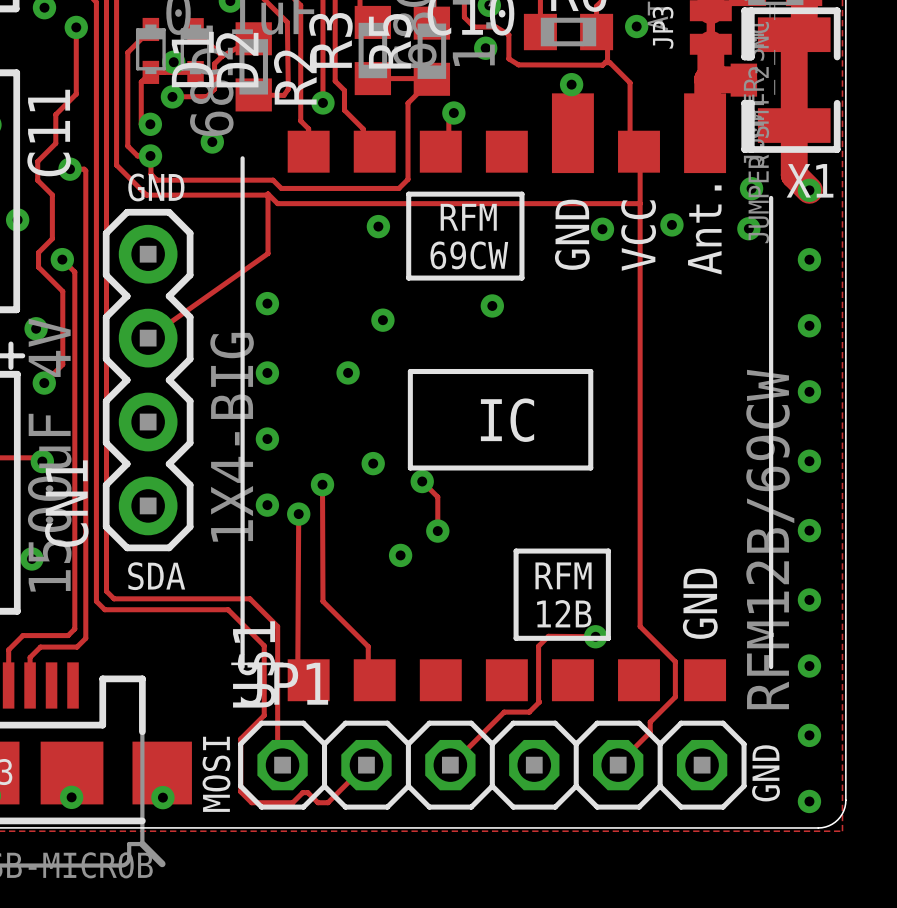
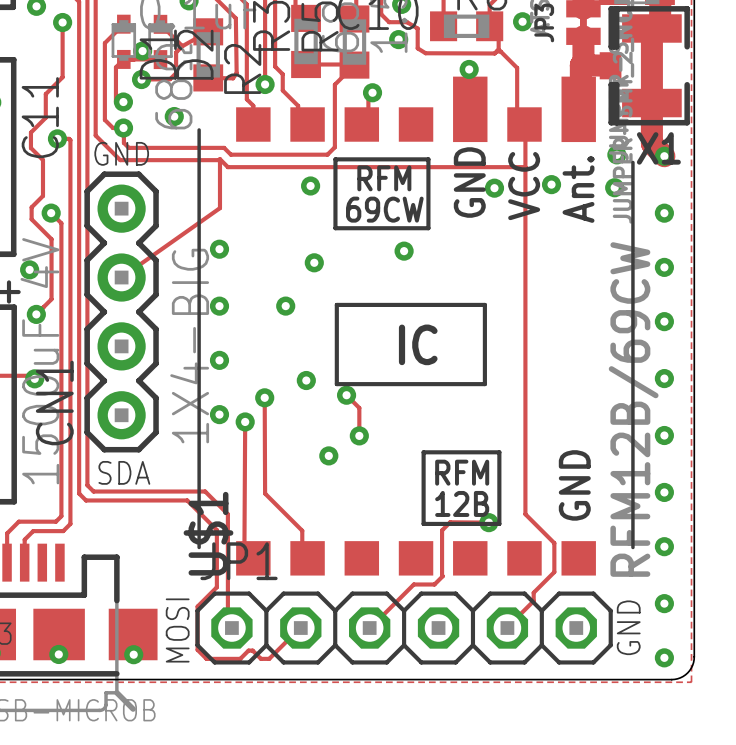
via: (17, 219) -> none
via: (31, 558) -> none

